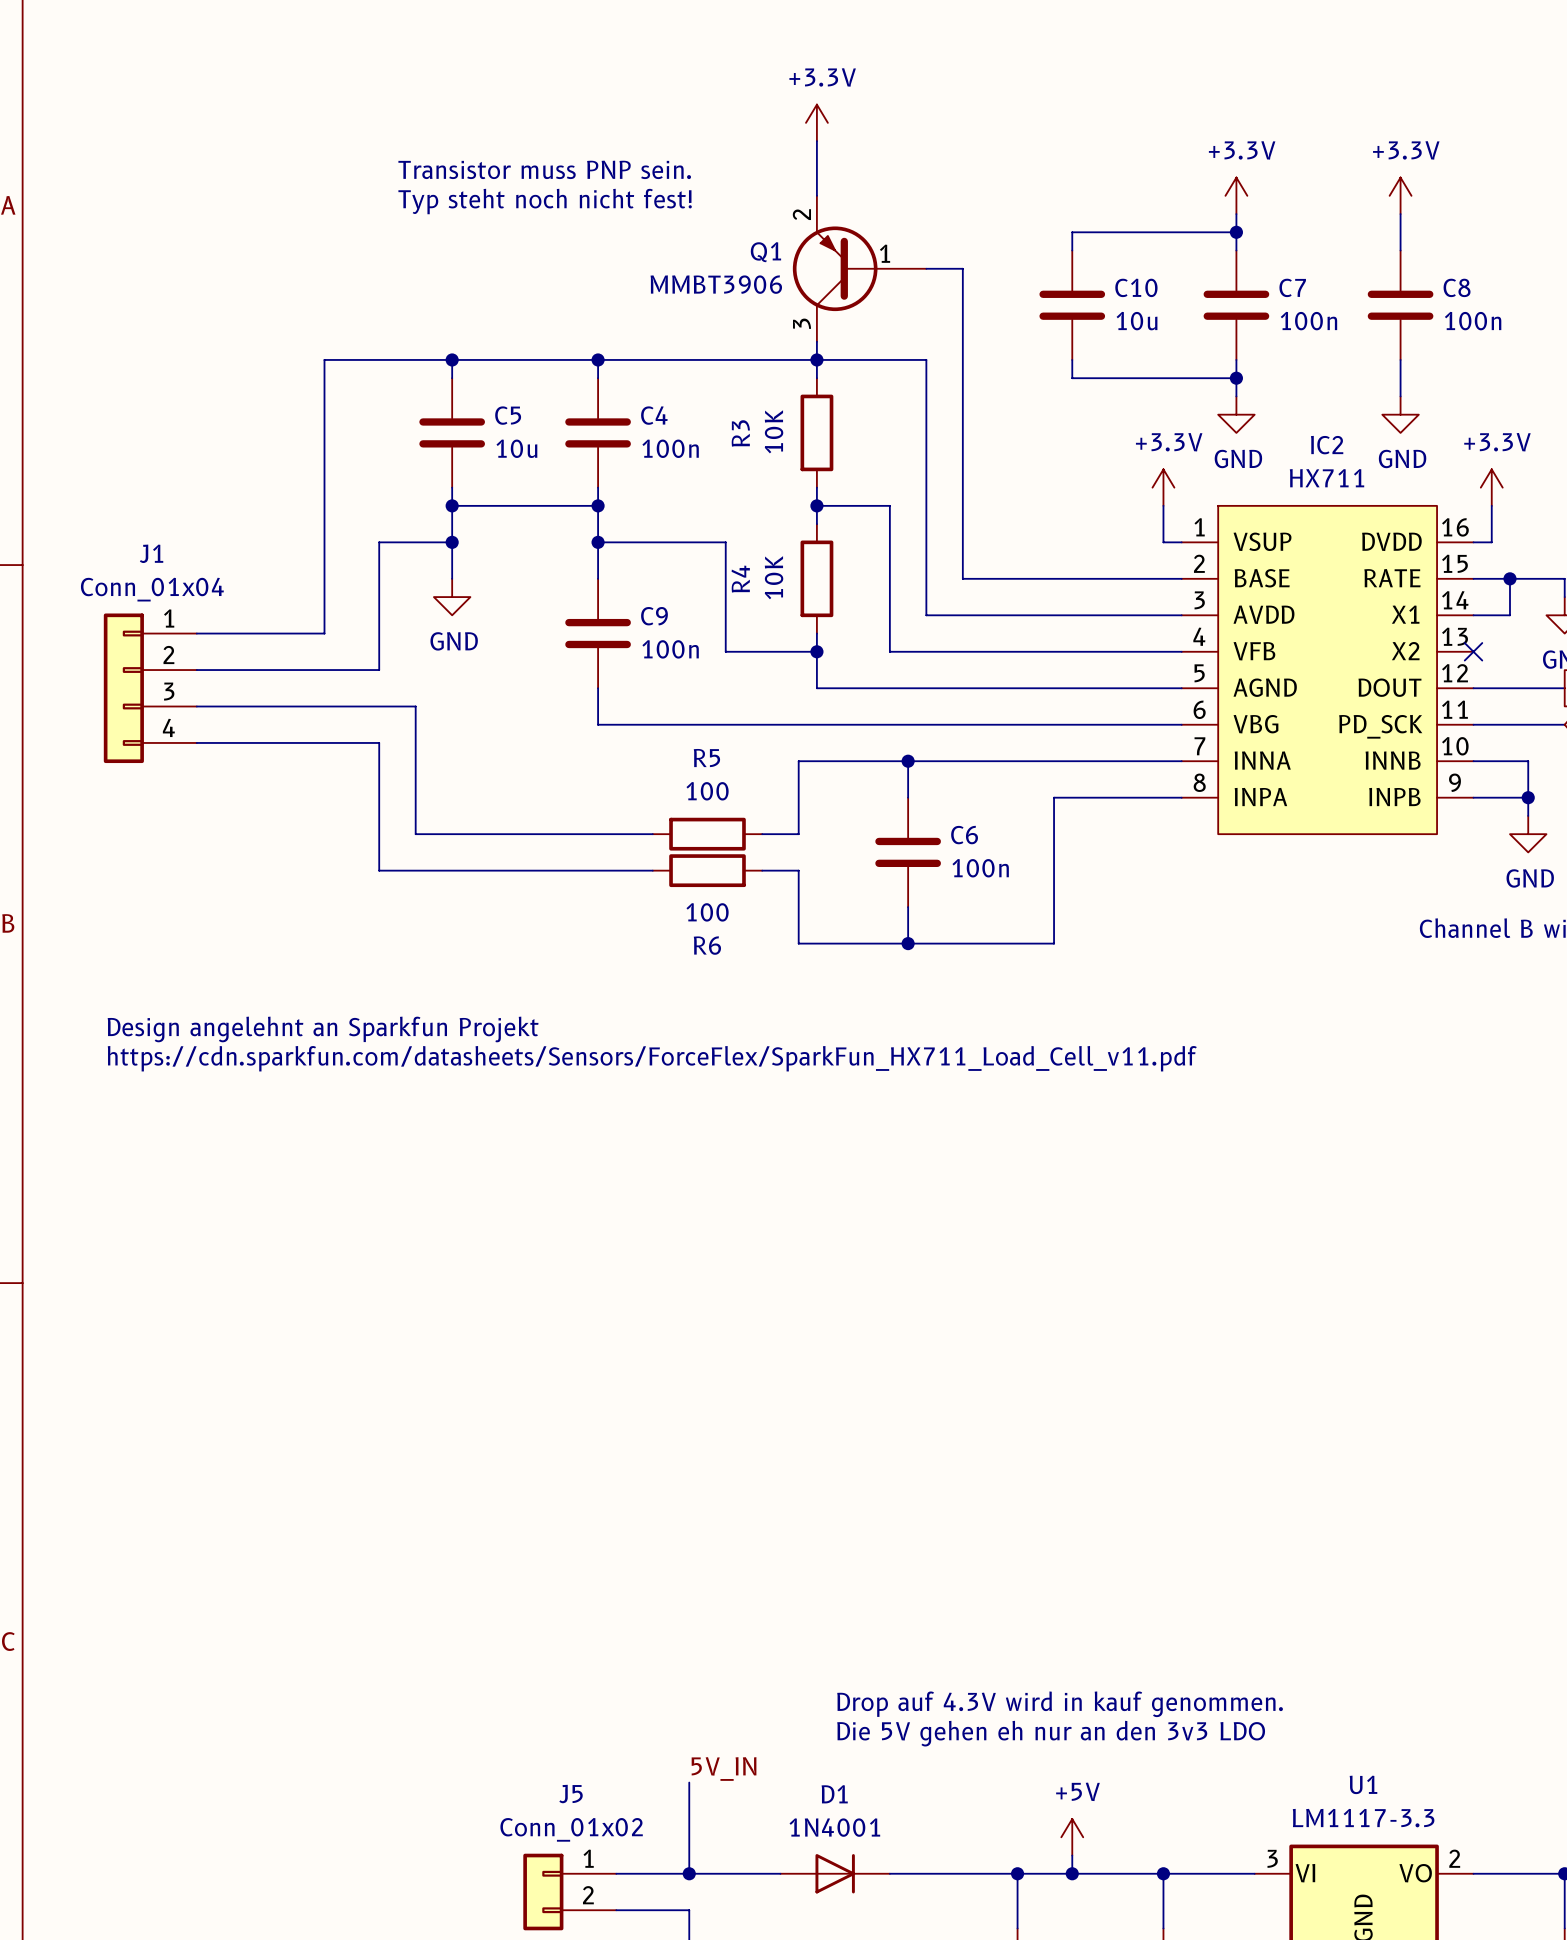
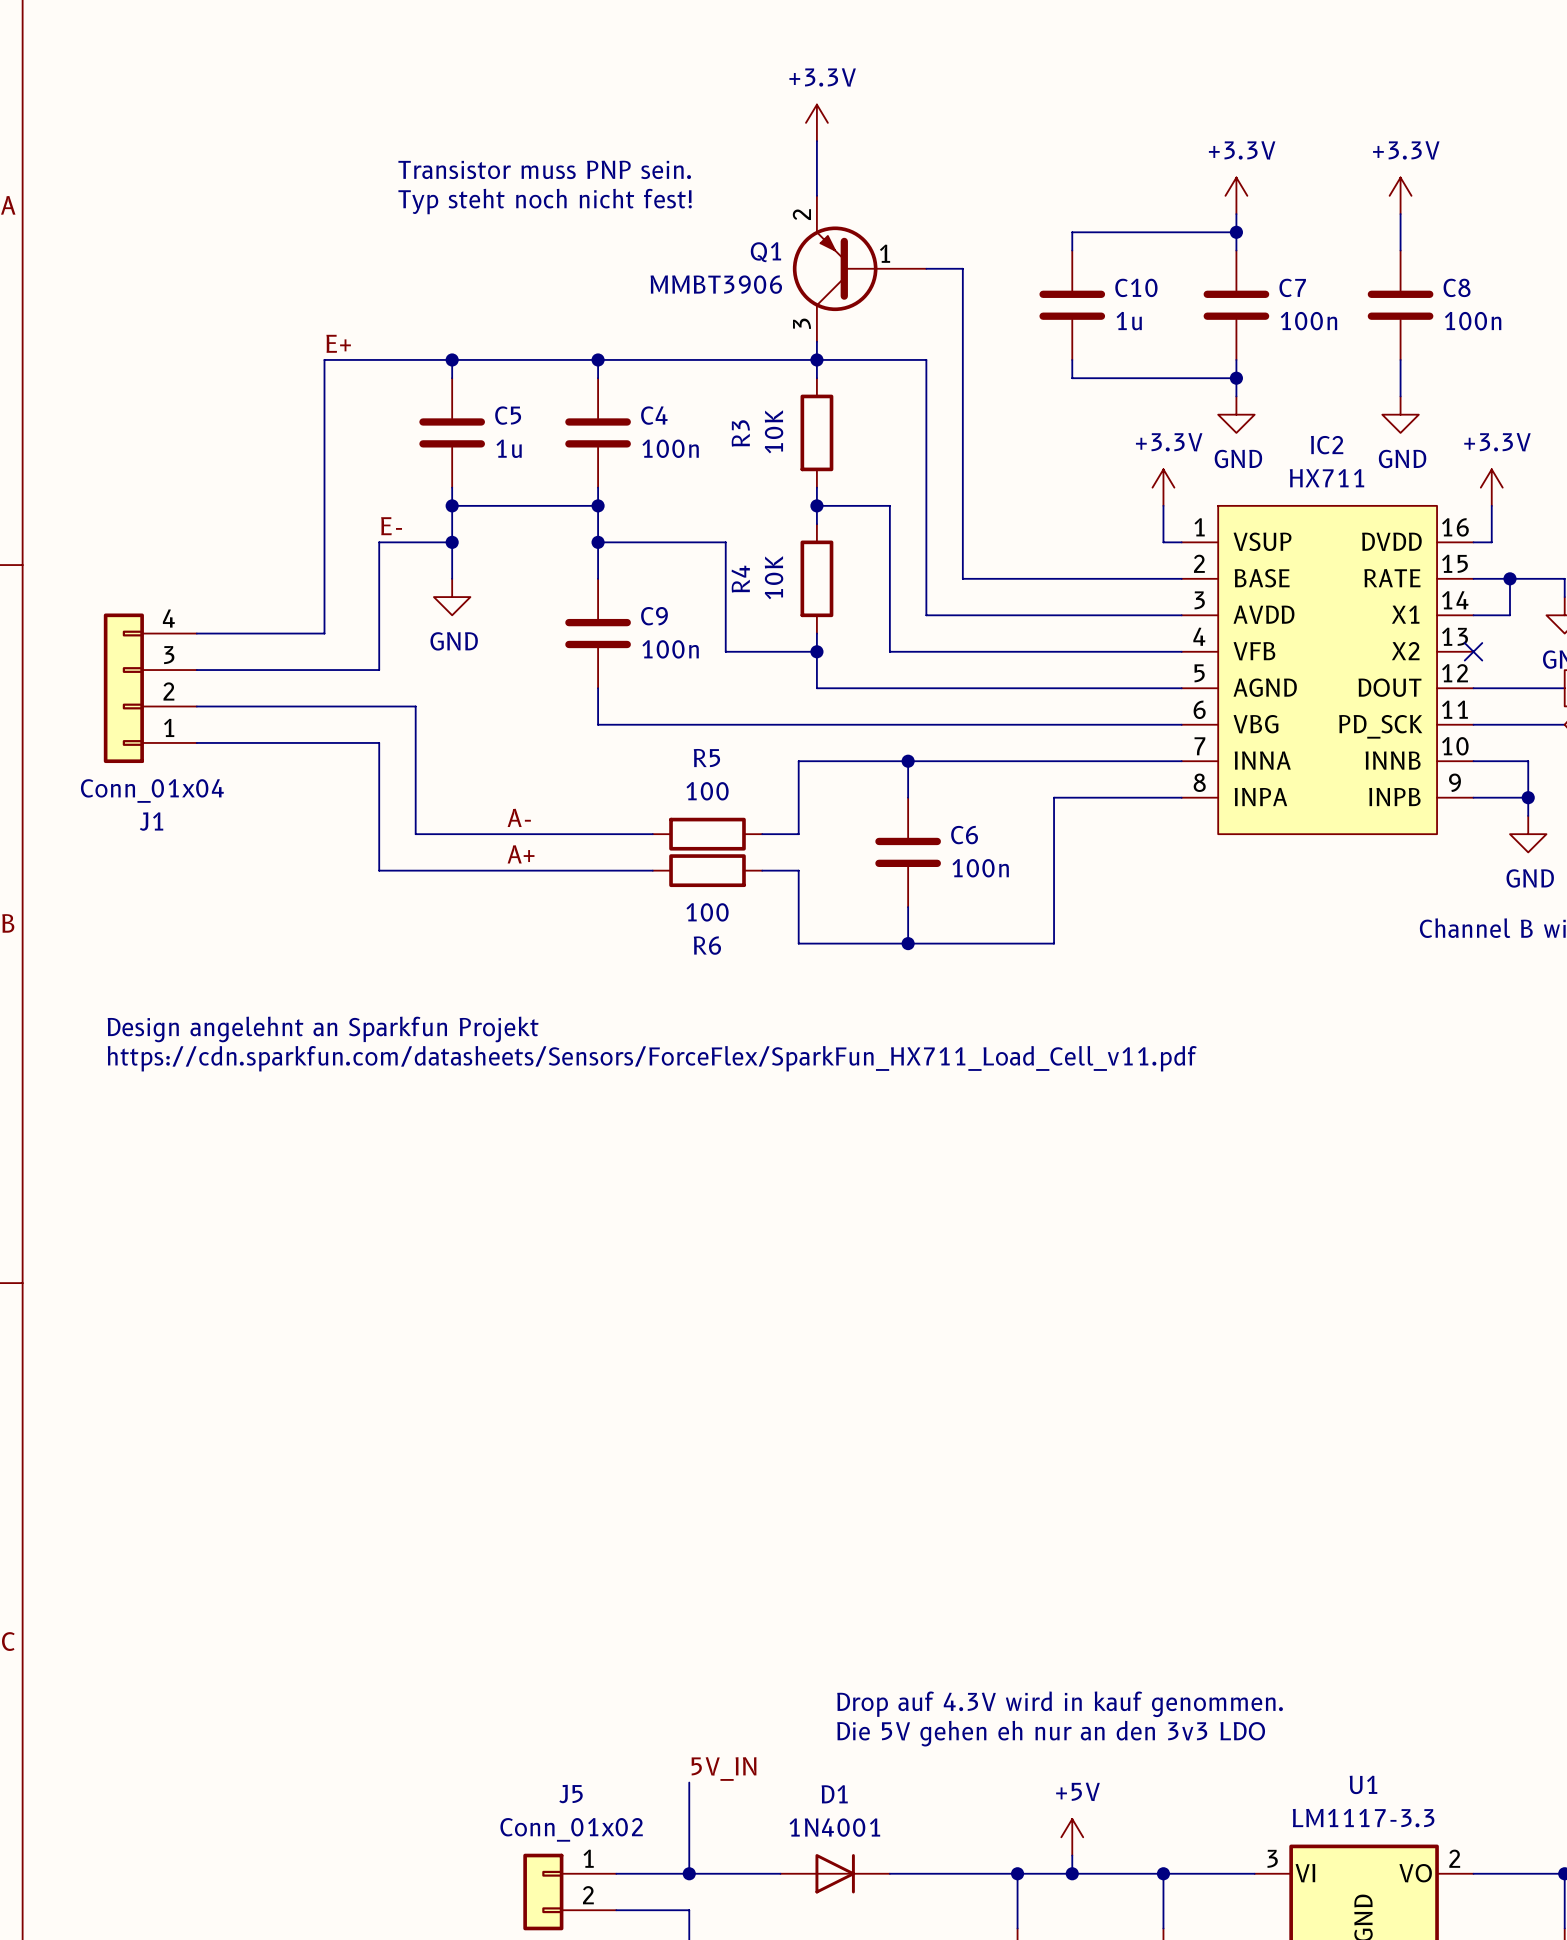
C10 value: 10u (1137, 321) -> 1u (1129, 321)
label: none -> E+ (338, 343)
C5 value: 10u (516, 448) -> 1u (509, 448)
label: none -> E- (391, 526)
J1 flip: as is (123, 688) -> up-down (123, 688)
label: none -> A- (519, 817)
label: none -> A+ (521, 854)

